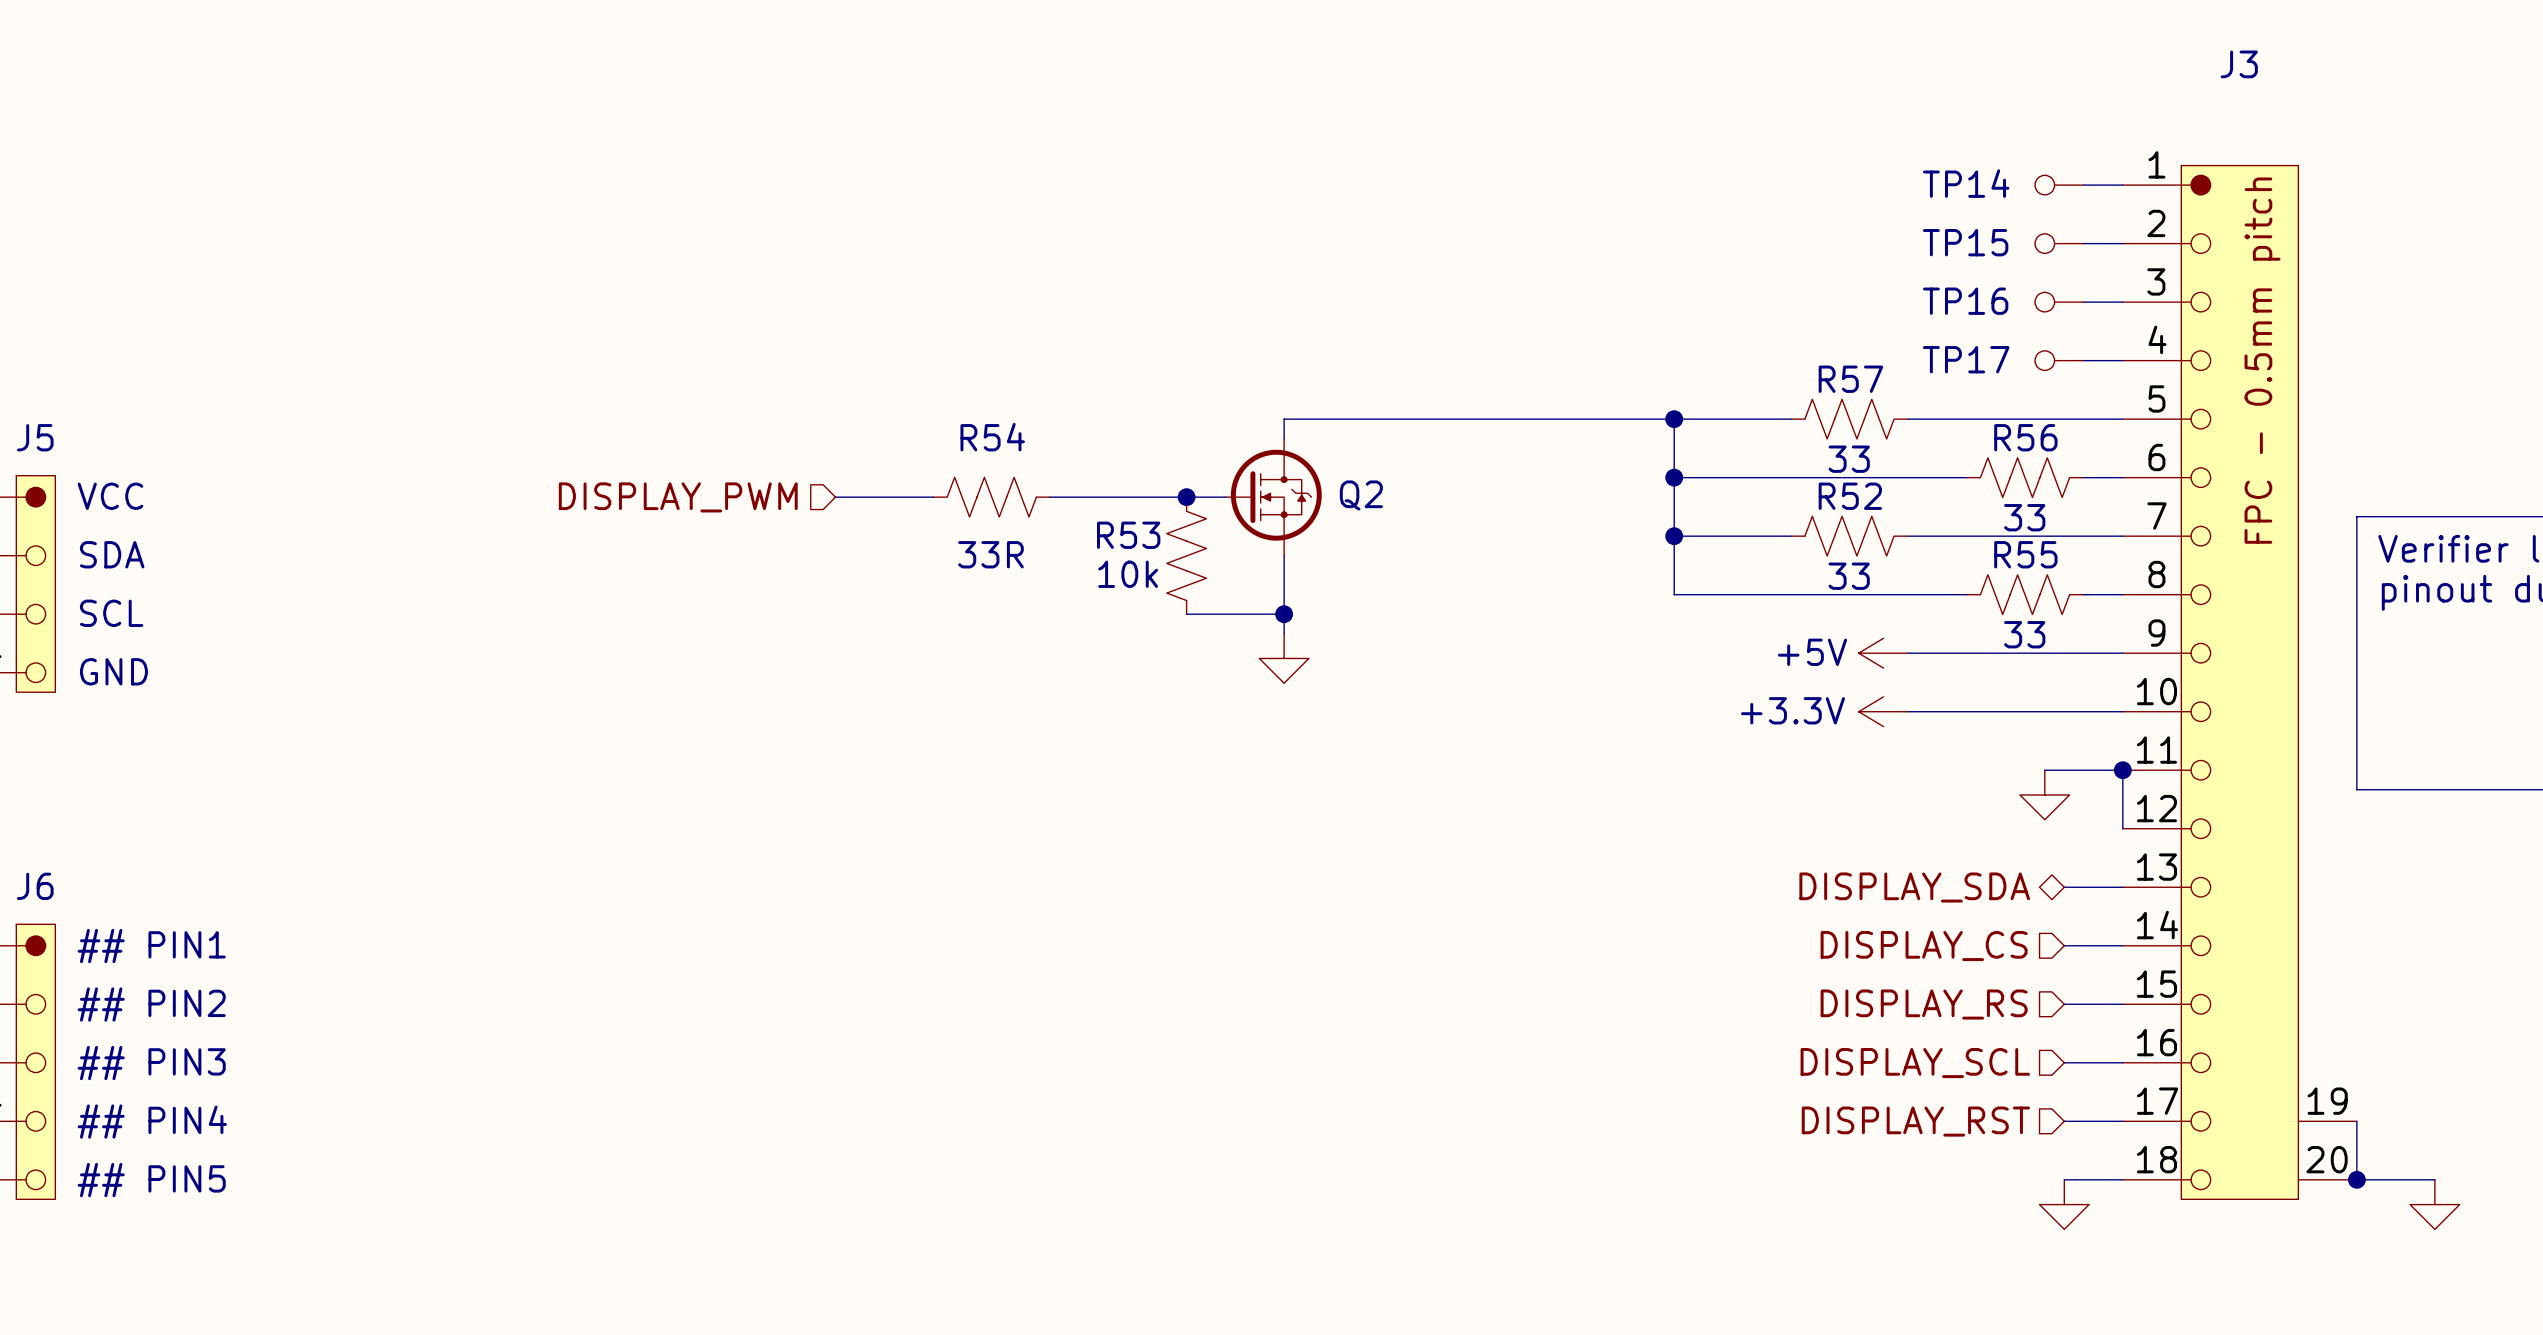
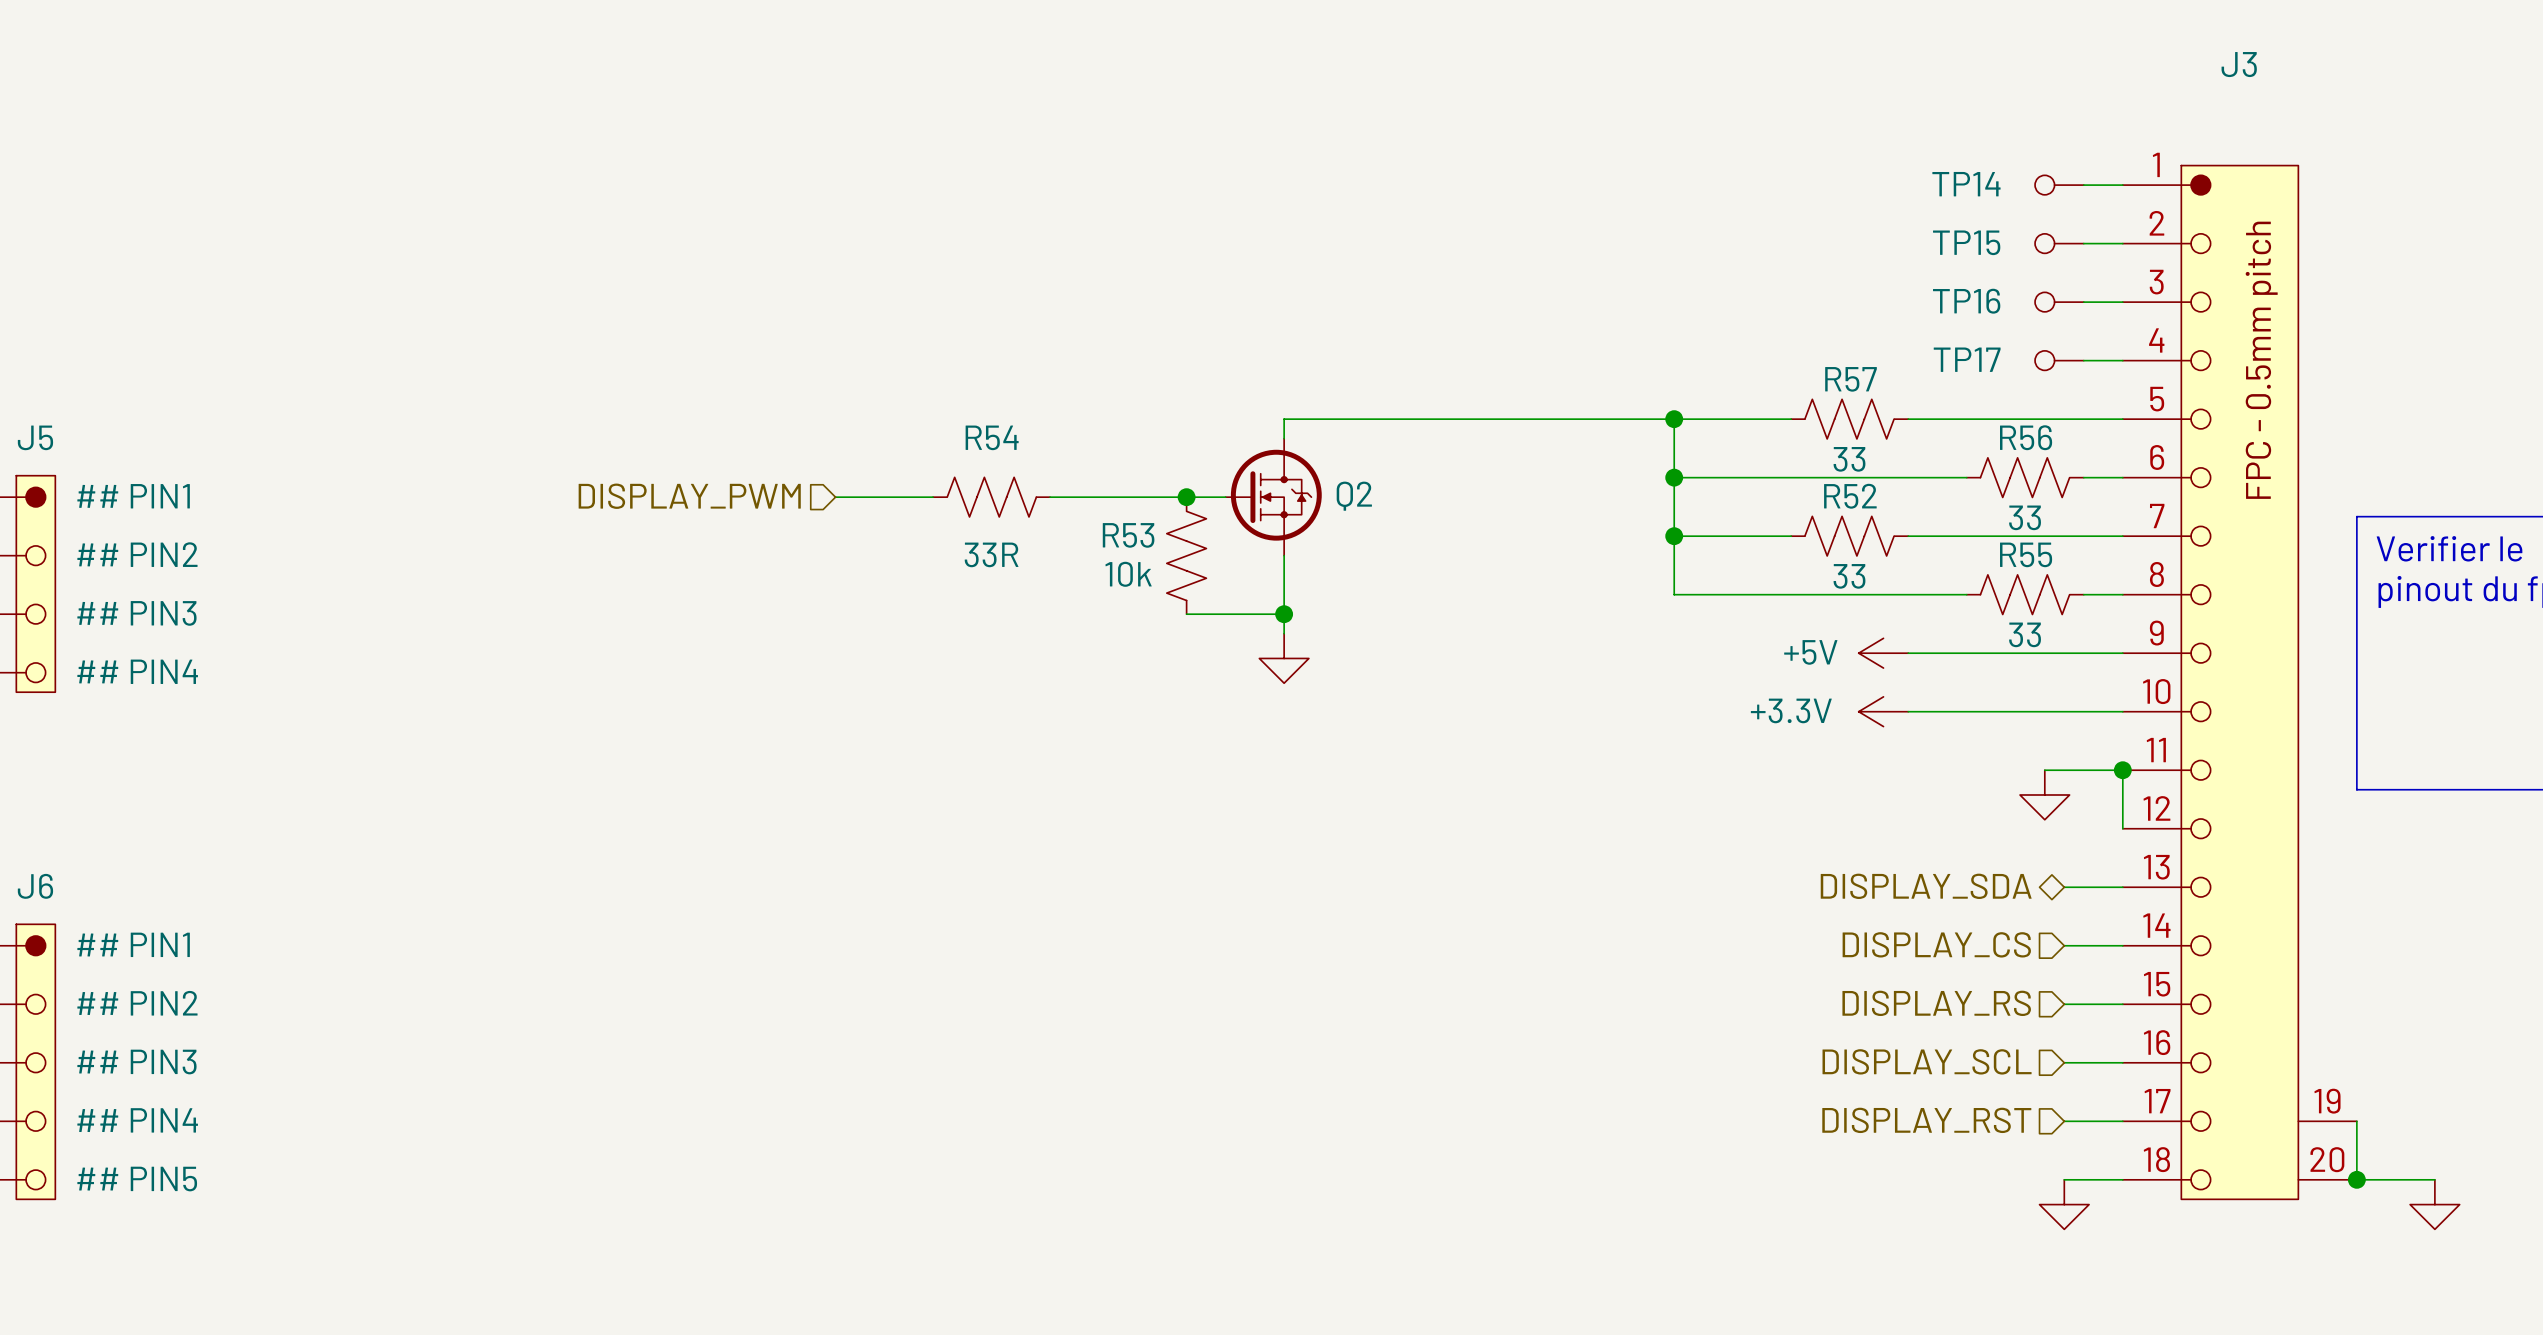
J5 text: VCC (110, 496) -> ## PIN1 (133, 496)
J5 text: SDA (112, 554) -> ## PIN2 (137, 554)
J5 text: SCL (111, 613) -> ## PIN3 (136, 613)
J5 text: GND (113, 671) -> ## PIN4 (137, 671)

